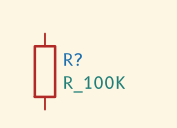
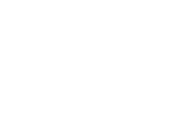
R?: R_100K (44, 71) -> none

